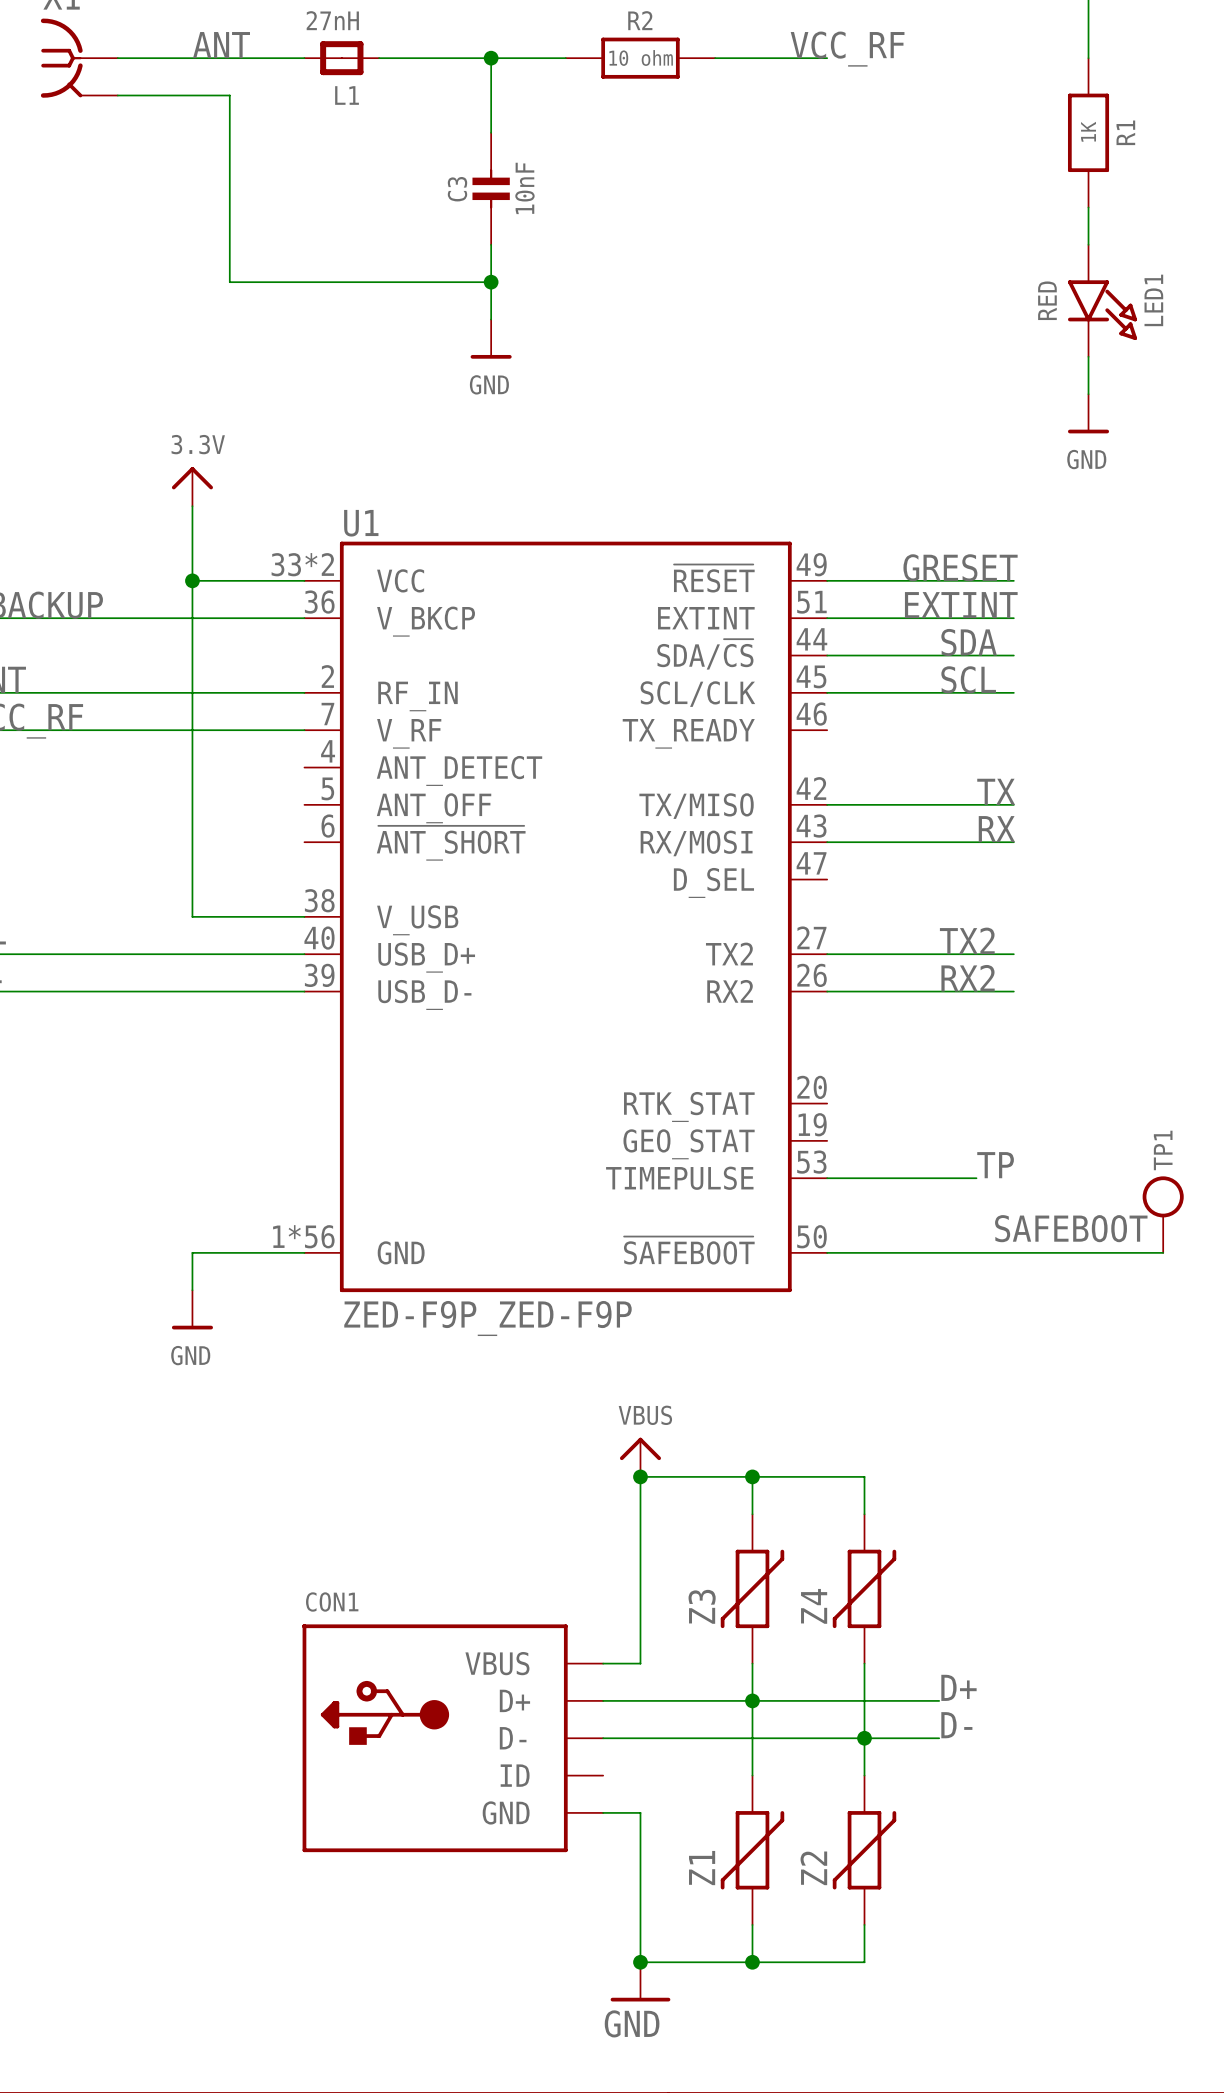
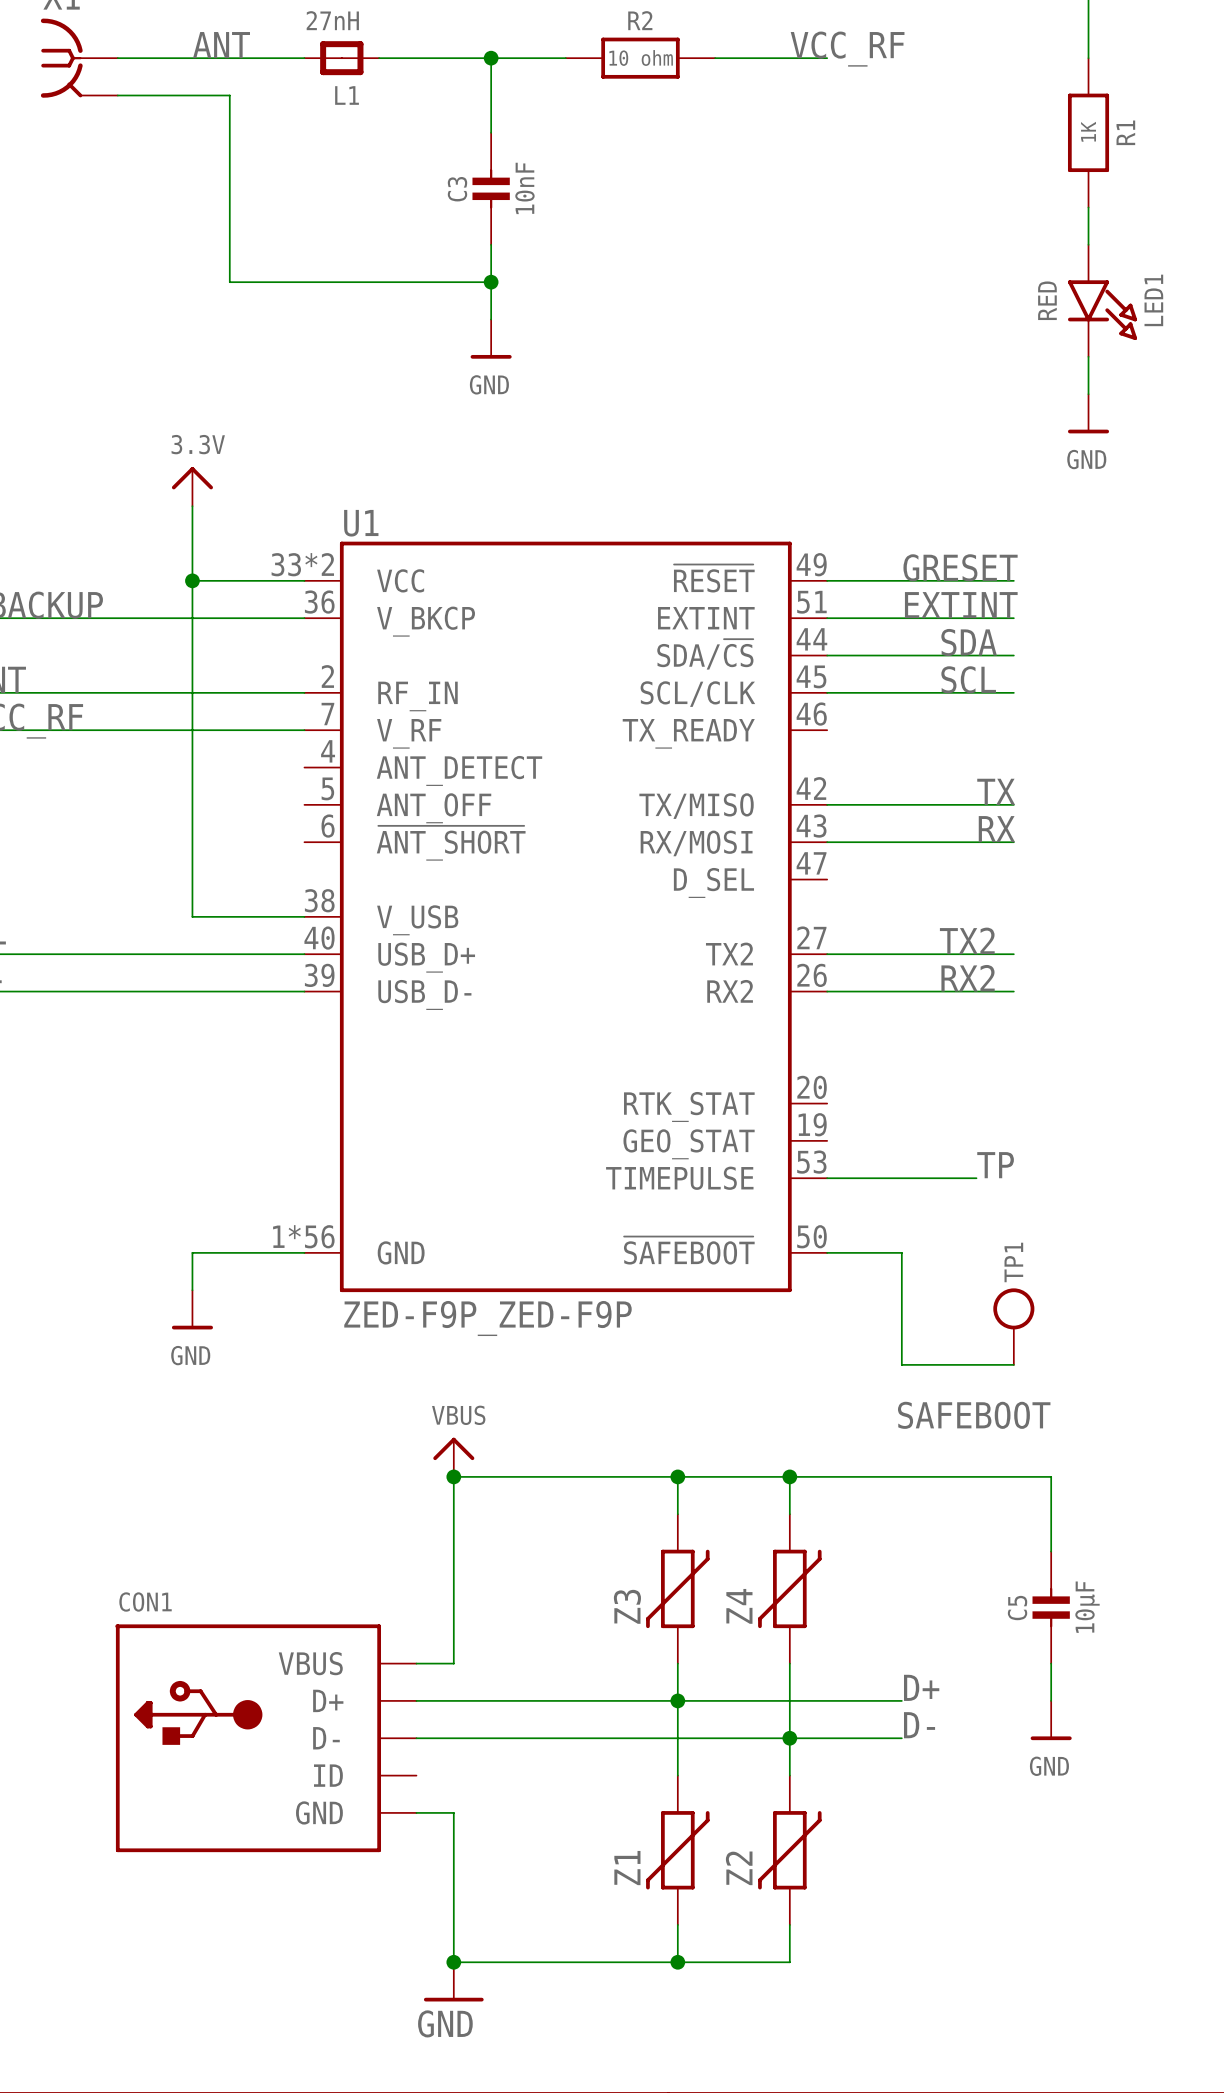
TP1 position: (1163, 1214) -> (1013, 1326)
label position: SAFEBOOT (1071, 1228) -> SAFEBOOT (974, 1415)
wire: (901, 1252) (1163, 1252) -> (901, 1252) (901, 1364) (1013, 1364)
power symbol position: VBUS (640, 1457) -> VBUS (453, 1457)
junction: none -> (453, 1476)
wire: (640, 1476) (640, 1663) (603, 1663) -> (640, 1476) (453, 1476) (453, 1663) (416, 1663)
junction: (640, 1476) -> none
junction: none -> (677, 1476)
wire: (752, 1476) (752, 1514) -> (677, 1476) (677, 1514)
junction: (752, 1476) -> none
wire: none -> (789, 1476) (789, 1514)
junction: none -> (789, 1476)
wire: (864, 1476) (864, 1514) -> (864, 1476) (1051, 1476) (1051, 1551)
Z3 position: (752, 1588) -> (677, 1588)
Z4 position: (864, 1588) -> (789, 1588)
C5: none -> 10µF (1051, 1607)
wire: (752, 1663) (752, 1775) -> (677, 1663) (677, 1775)
wire: (864, 1663) (864, 1775) -> (789, 1663) (789, 1775)
wire: none -> (1051, 1663) (1051, 1700)
label position: D+ (958, 1687) -> D+ (921, 1687)
wire: none -> (416, 1700) (603, 1700)
junction: none -> (677, 1700)
junction: (752, 1700) -> none
wire: (901, 1700) (939, 1700) -> none
power symbol: none -> GND (1051, 1720)
label position: D- (956, 1725) -> D- (919, 1725)
wire: none -> (416, 1738) (603, 1738)
CON1 position: (452, 1738) -> (265, 1738)
junction: none -> (789, 1738)
junction: (864, 1738) -> none
wire: (901, 1738) (939, 1738) -> none
wire: (603, 1812) (640, 1812) (640, 1962) -> (416, 1812) (453, 1812) (453, 1962) (640, 1962)
Z1 position: (752, 1850) -> (677, 1850)
Z2 position: (864, 1850) -> (789, 1850)
wire: (752, 1924) (752, 1962) -> (677, 1924) (677, 1962)
wire: (864, 1924) (864, 1962) (789, 1962) -> (789, 1924) (789, 1962)
junction: none -> (453, 1962)
junction: (640, 1962) -> none
junction: none -> (677, 1962)
junction: (752, 1962) -> none
power symbol position: GND (640, 1981) -> GND (453, 1981)

